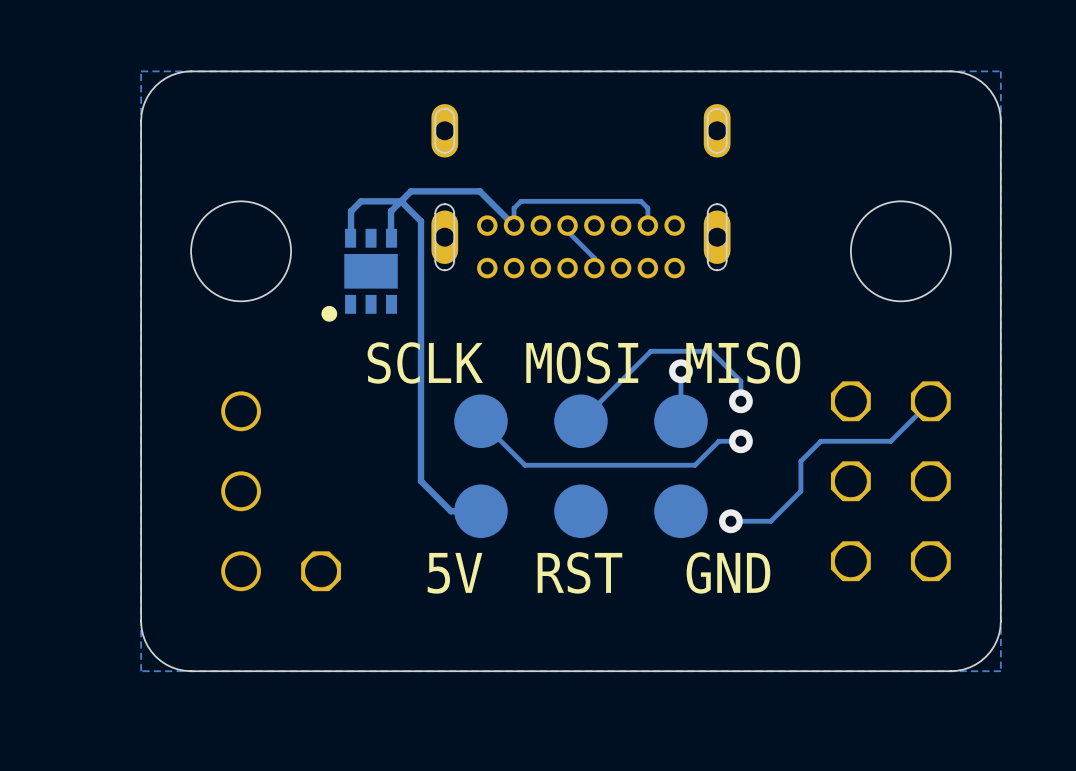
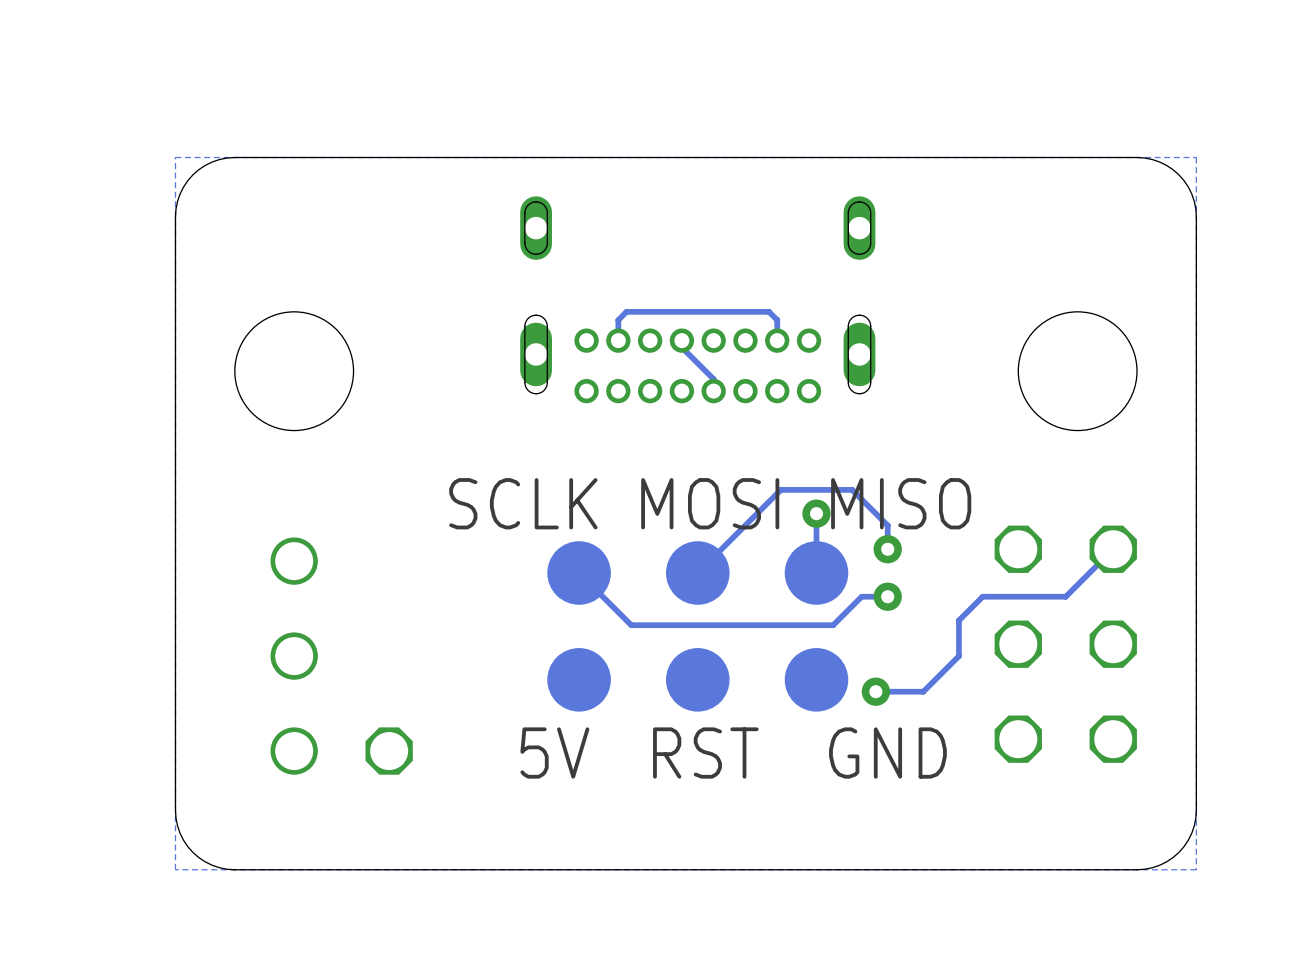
track: (514, 225) (479, 191) (411, 191) (391, 211) (391, 238) -> none
track: (350, 238) (351, 211) (361, 201) (401, 201) (421, 221) (421, 481) (451, 511) (481, 511) -> none
part: (359, 275) -> none

